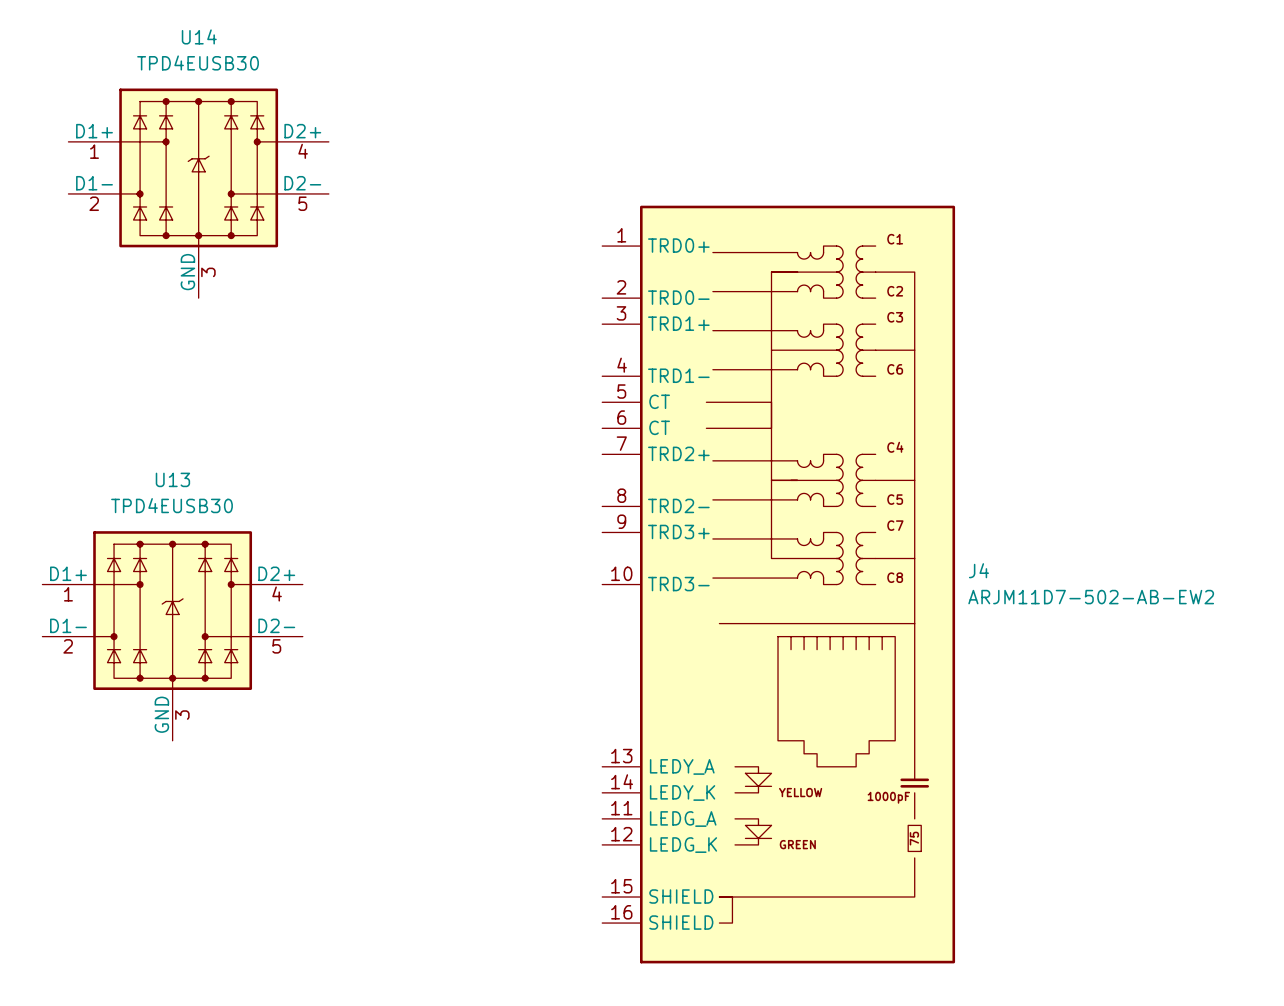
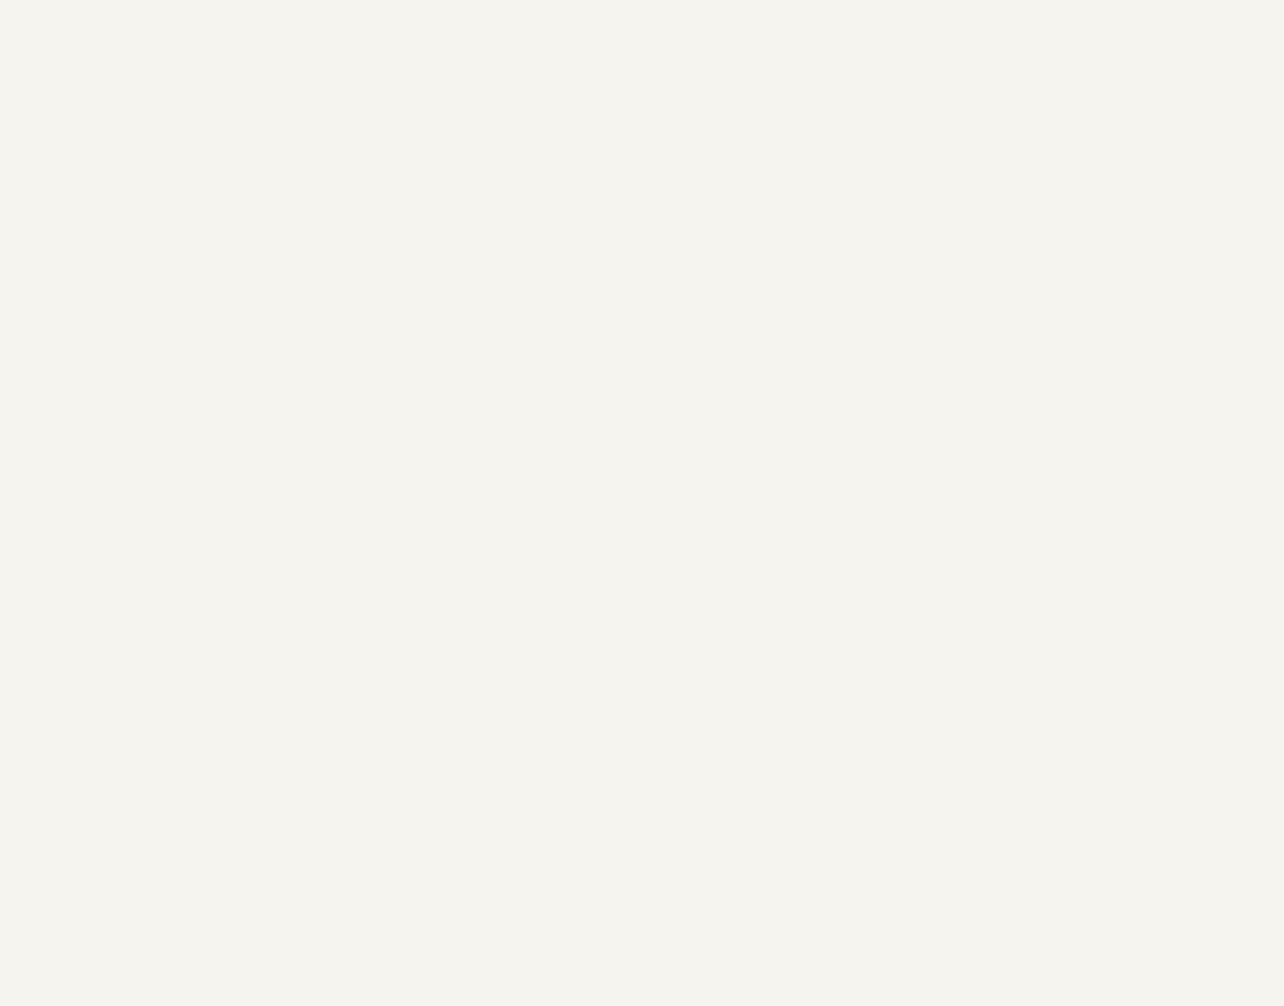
U14: TPD4EUSB30 (198, 193) -> none
J4: ARJM11D7-502-AB-EW2 (778, 584) -> none
U13: TPD4EUSB30 (172, 635) -> none

